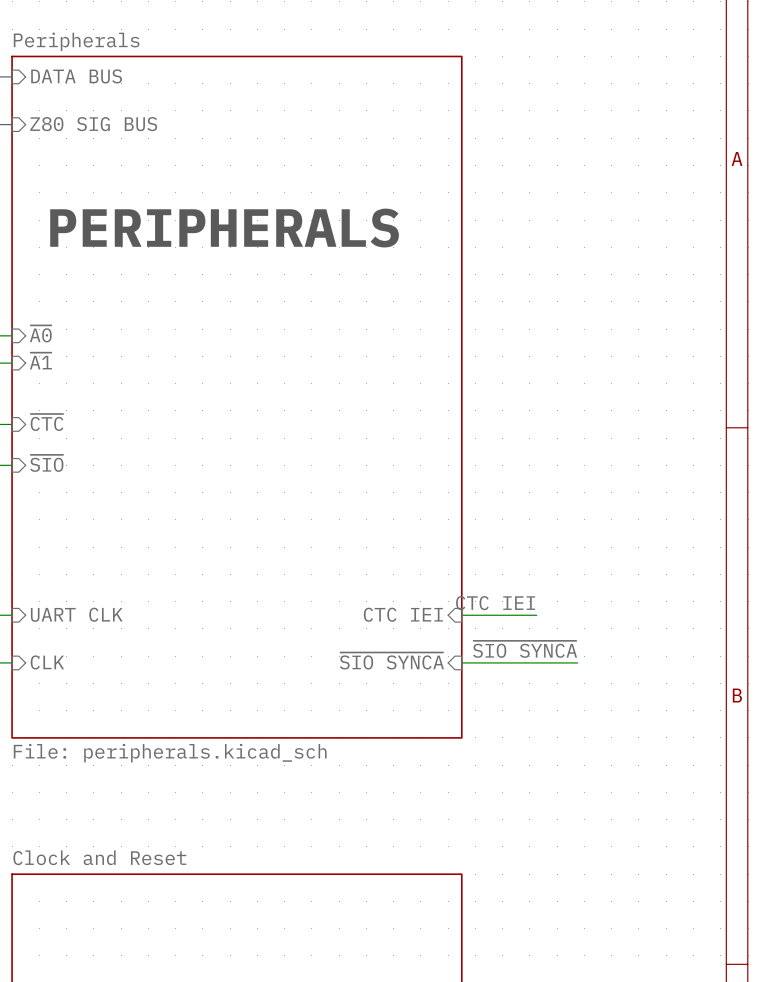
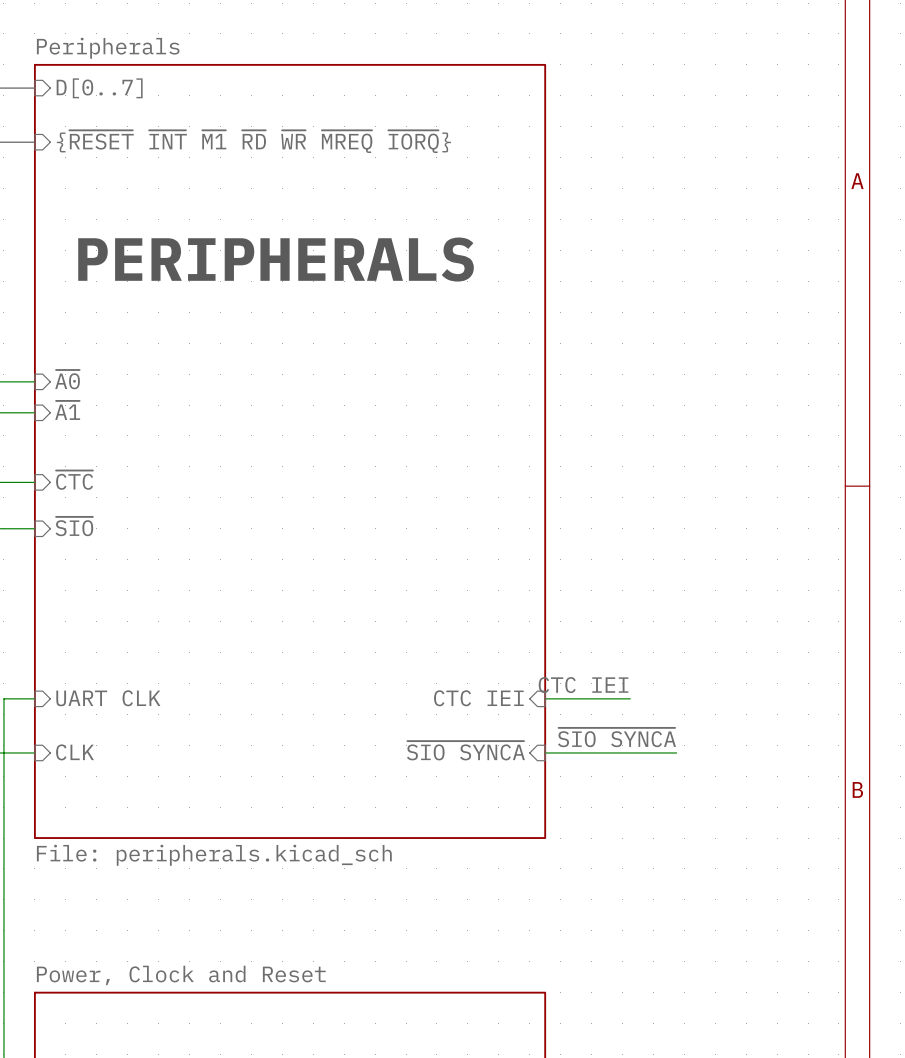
sheet pin: DATA BUS (76, 76) -> D[0..7] (99, 88)
sheet pin: Z80 SIG BUS (93, 124) -> {~{RESET} ~{INT} ~{M1} ~{RD} ~{WR} ~{MREQ} ~{IORQ}} (253, 141)
sheet Clock and Reset name: Clock and Reset (99, 857) -> Power, Clock and Reset (181, 975)

